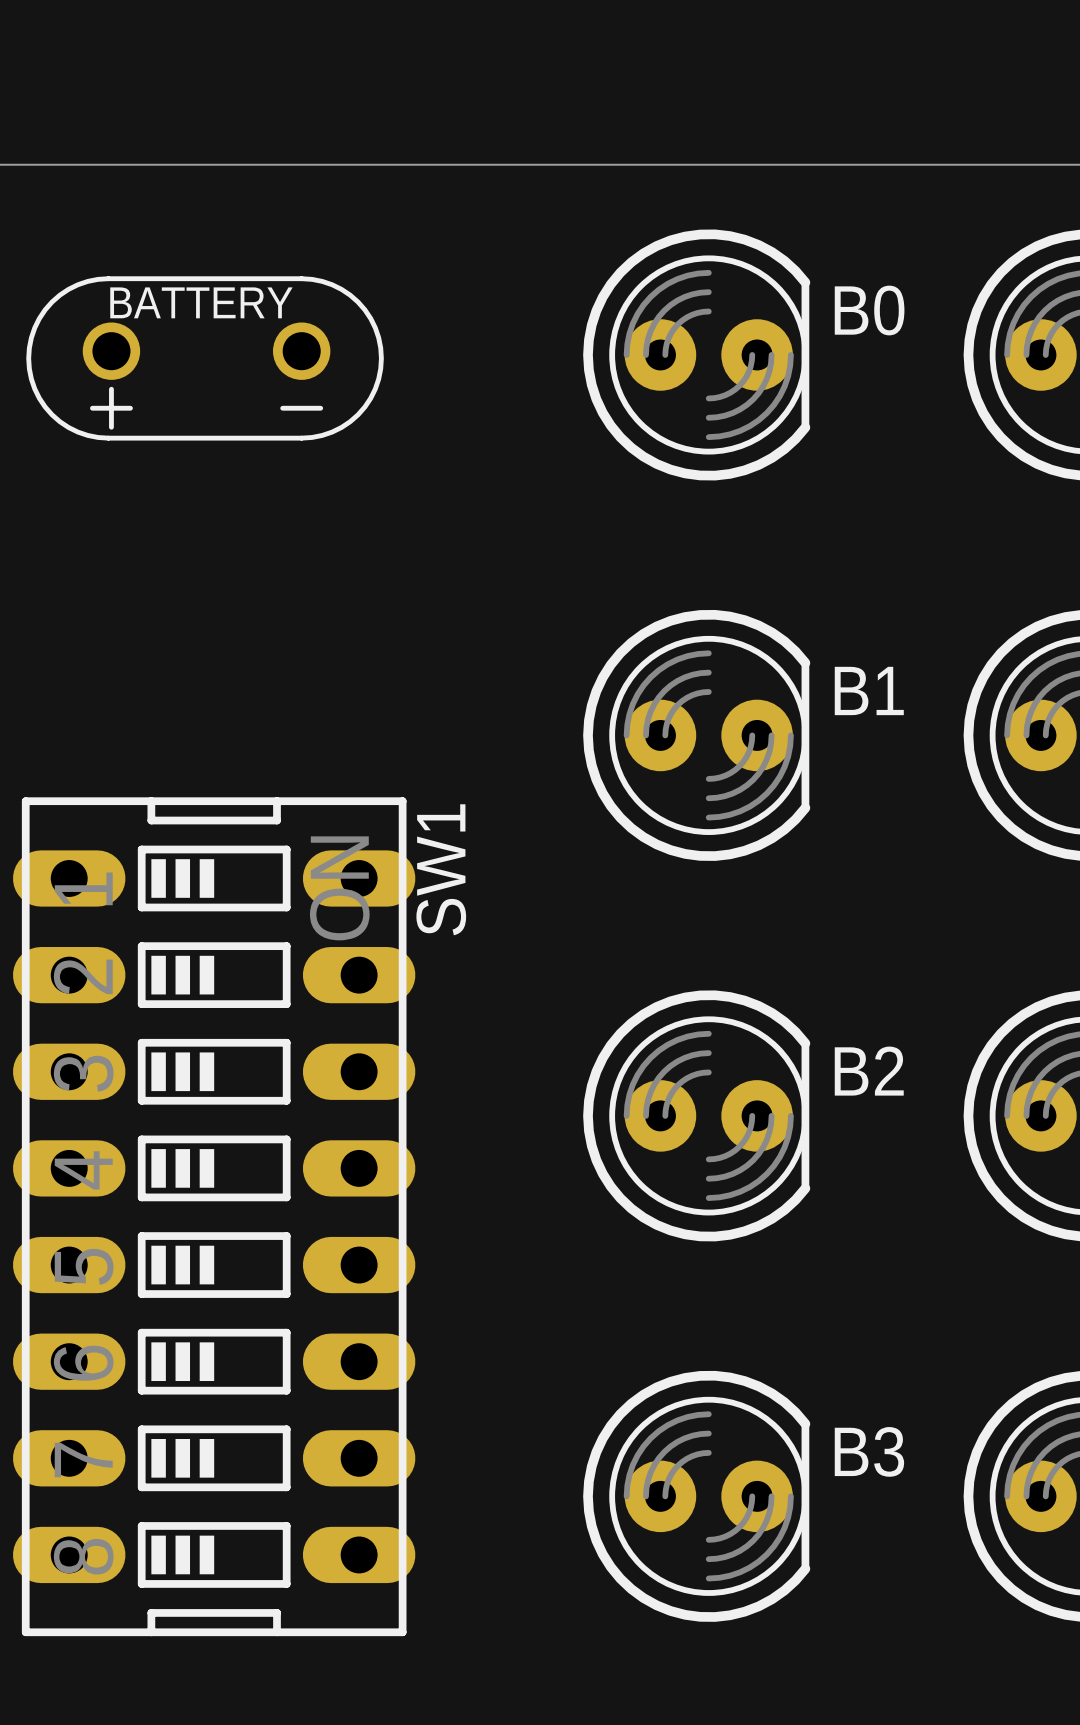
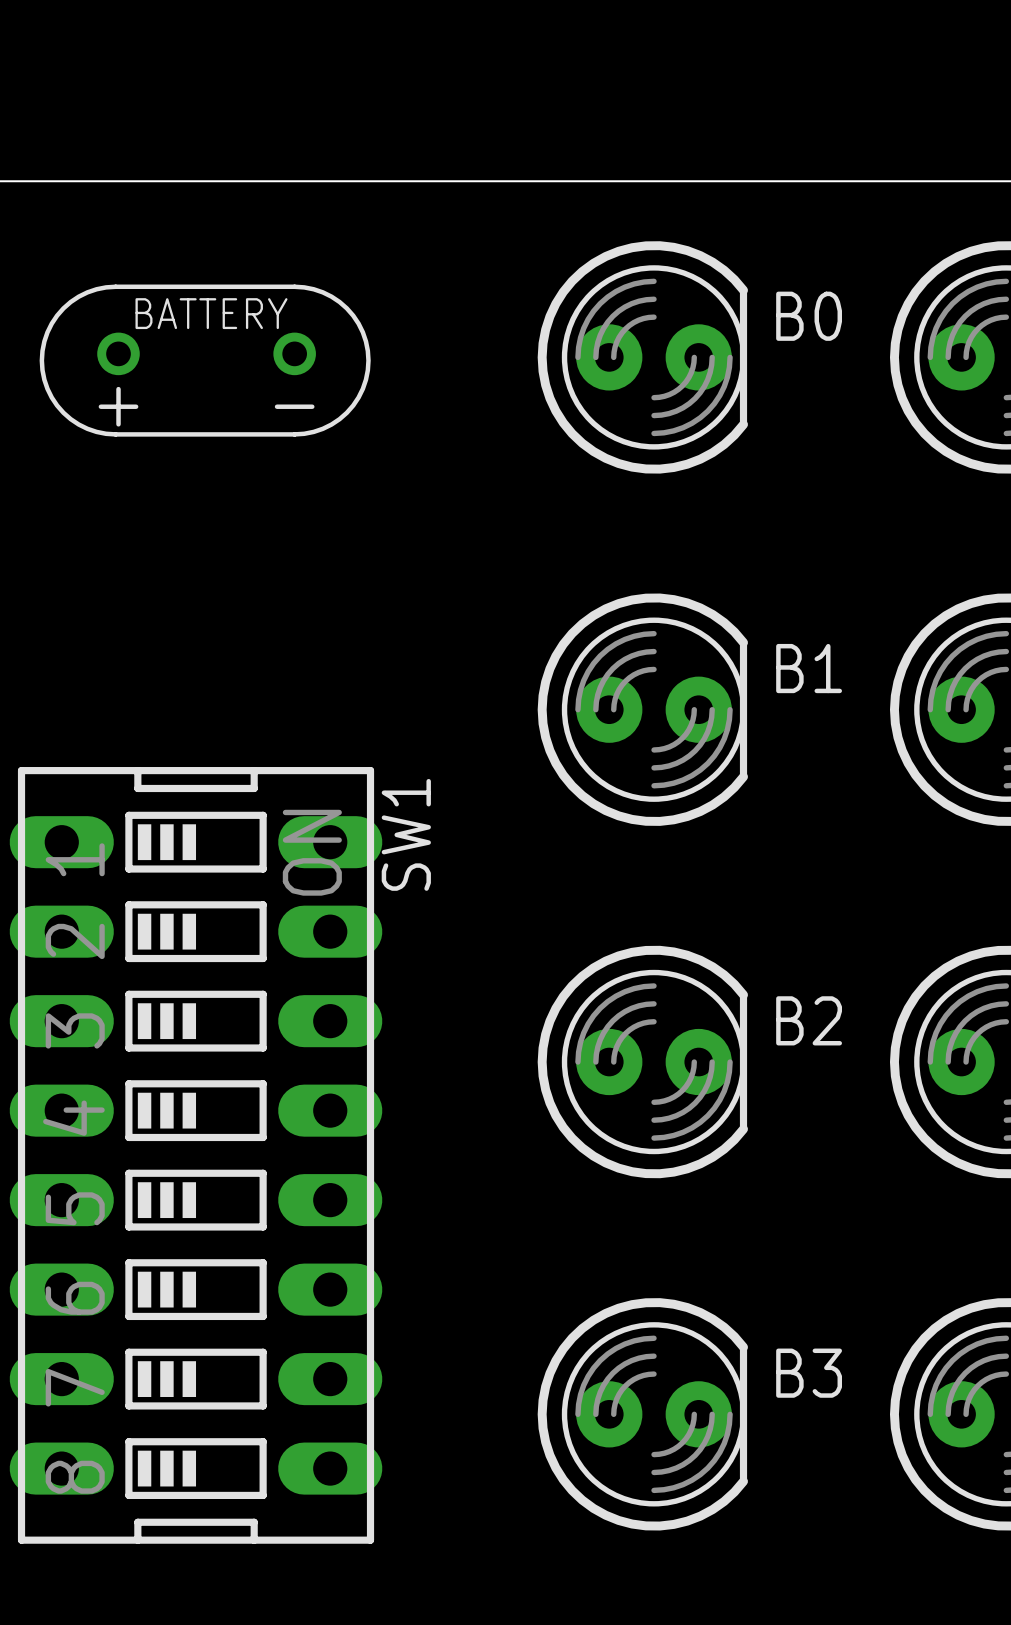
part footprint: [26, 276, 384, 441] -> [39, 284, 371, 437]

